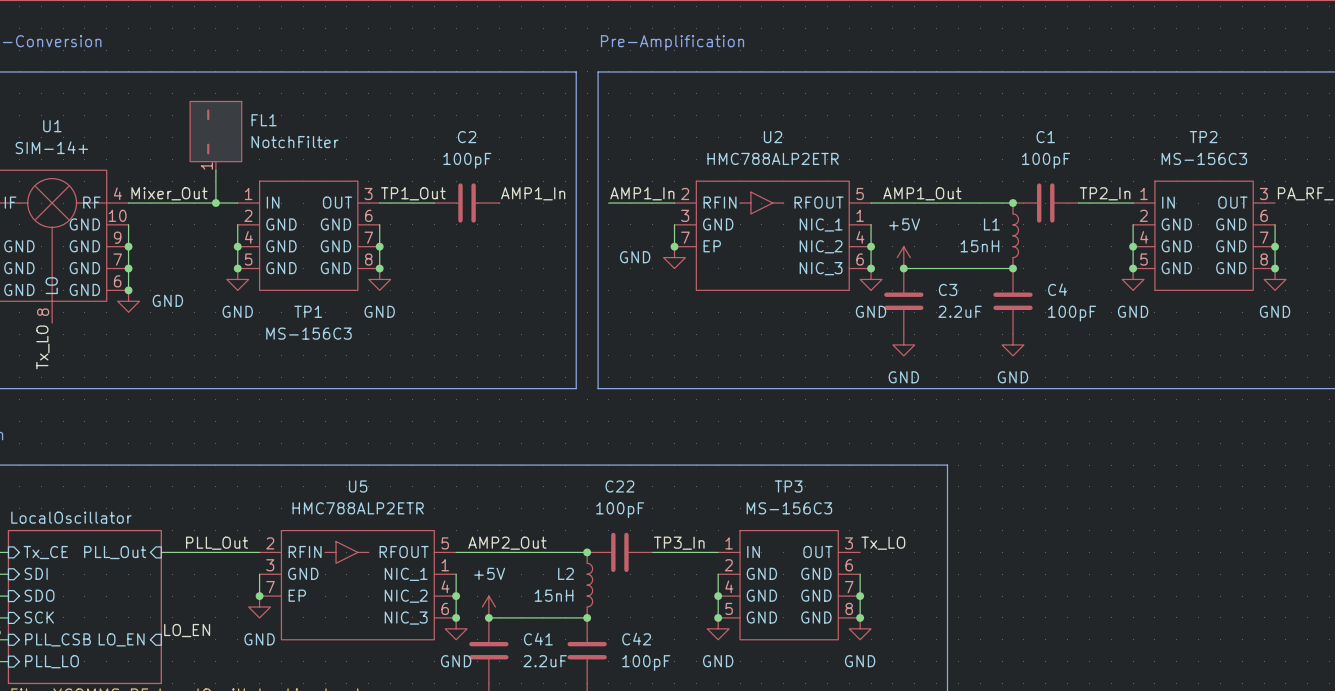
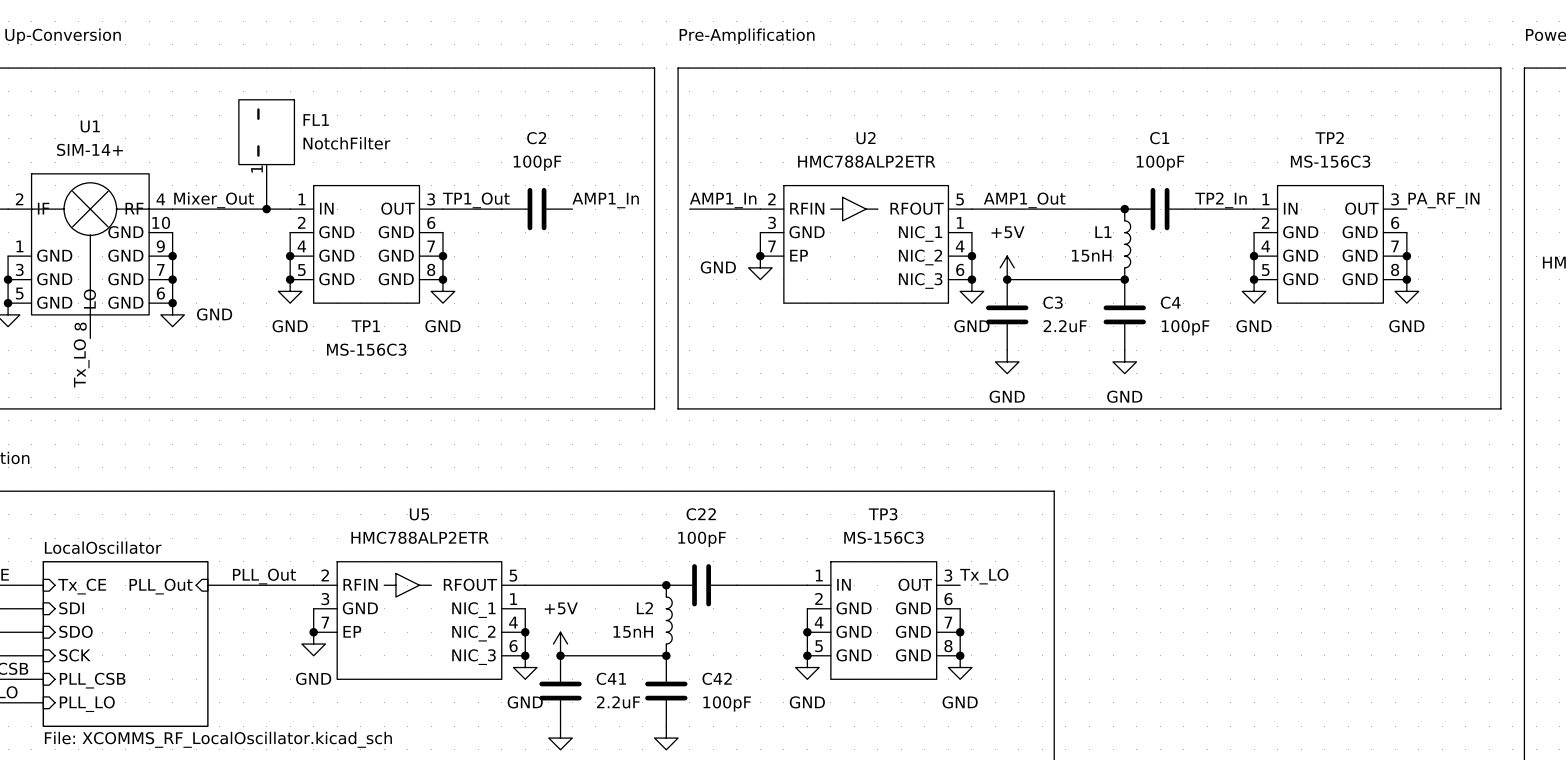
label: AMP2_Out (507, 543) -> none
label: TP3_In (679, 543) -> none
label: LO_EN (187, 630) -> none
sheet pin: LO_EN (121, 639) -> none

